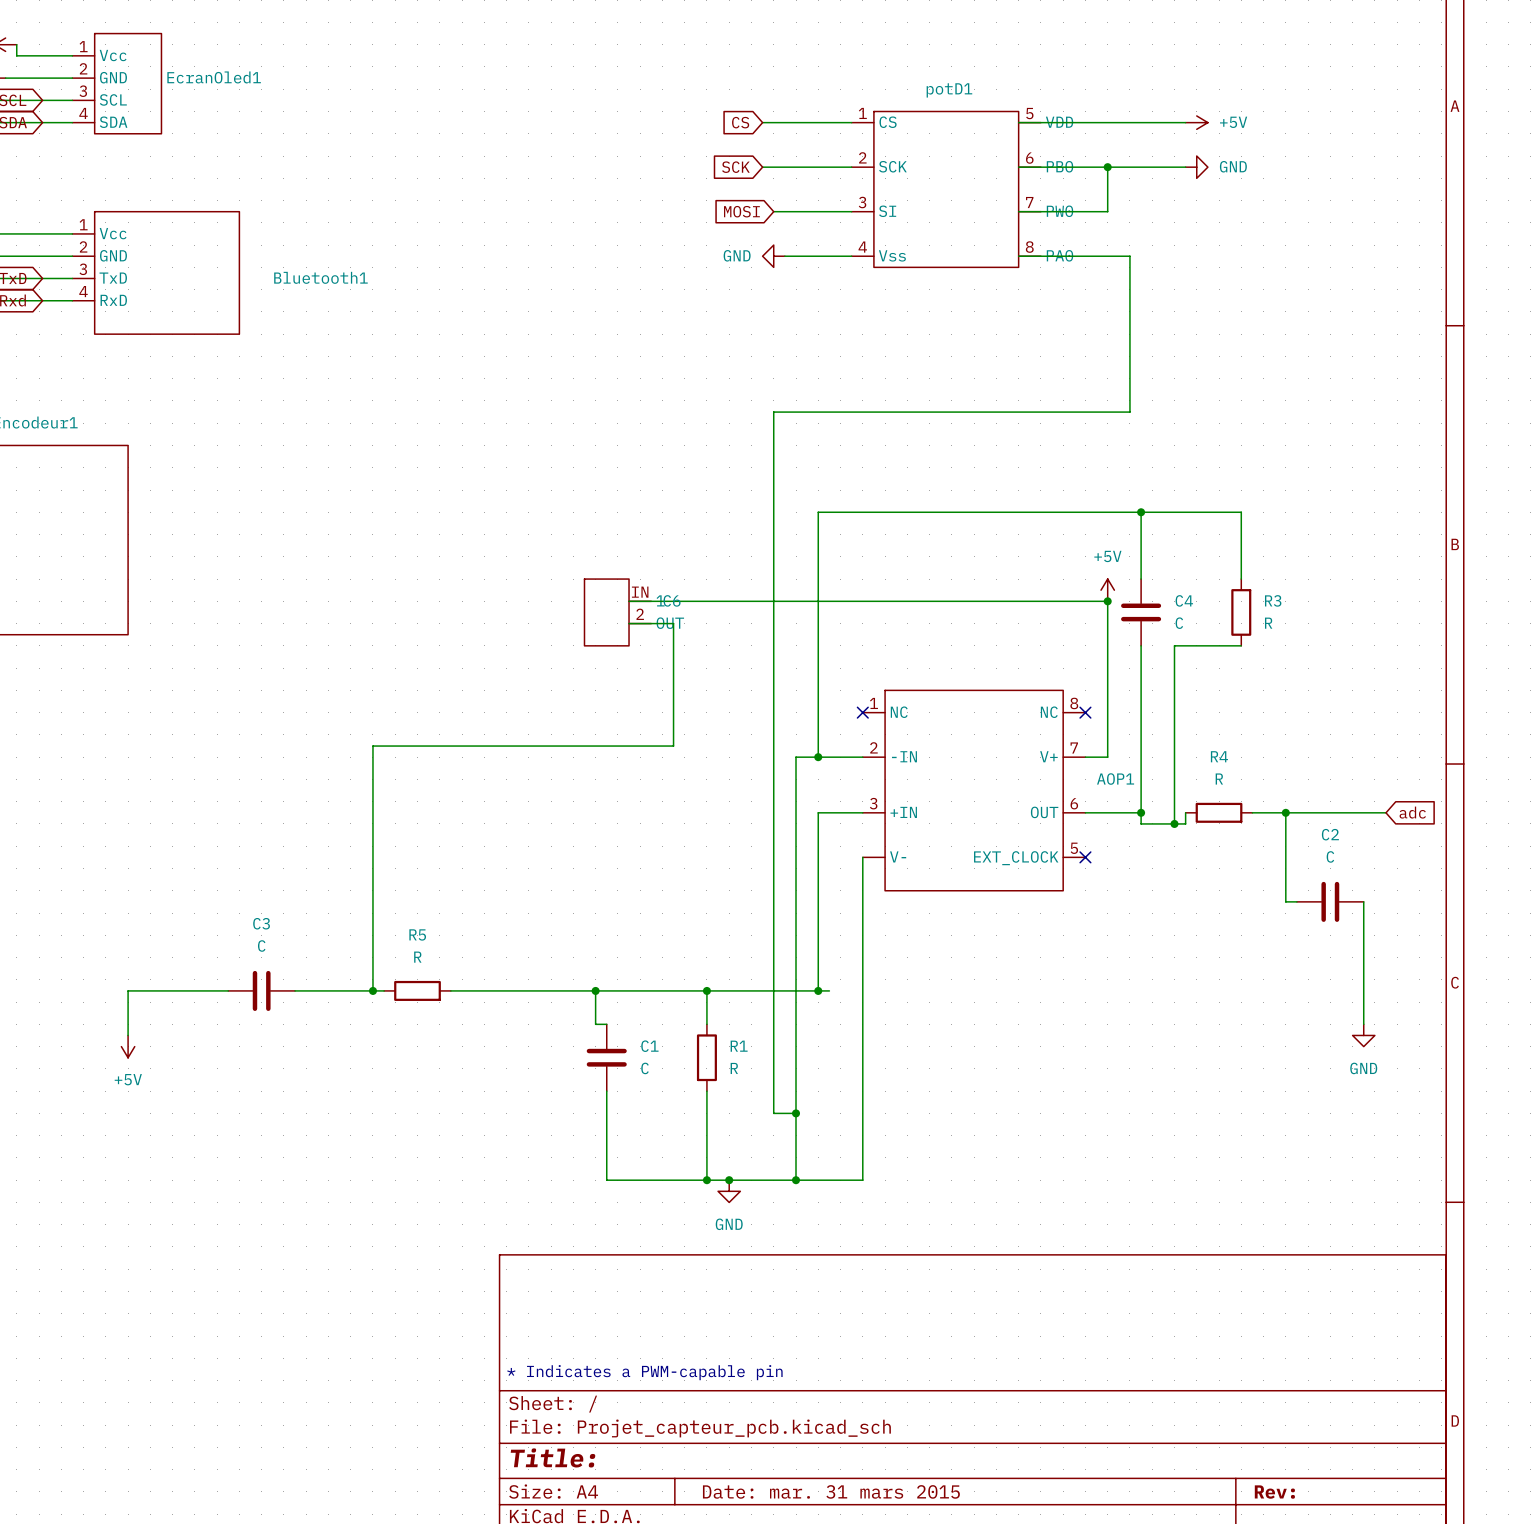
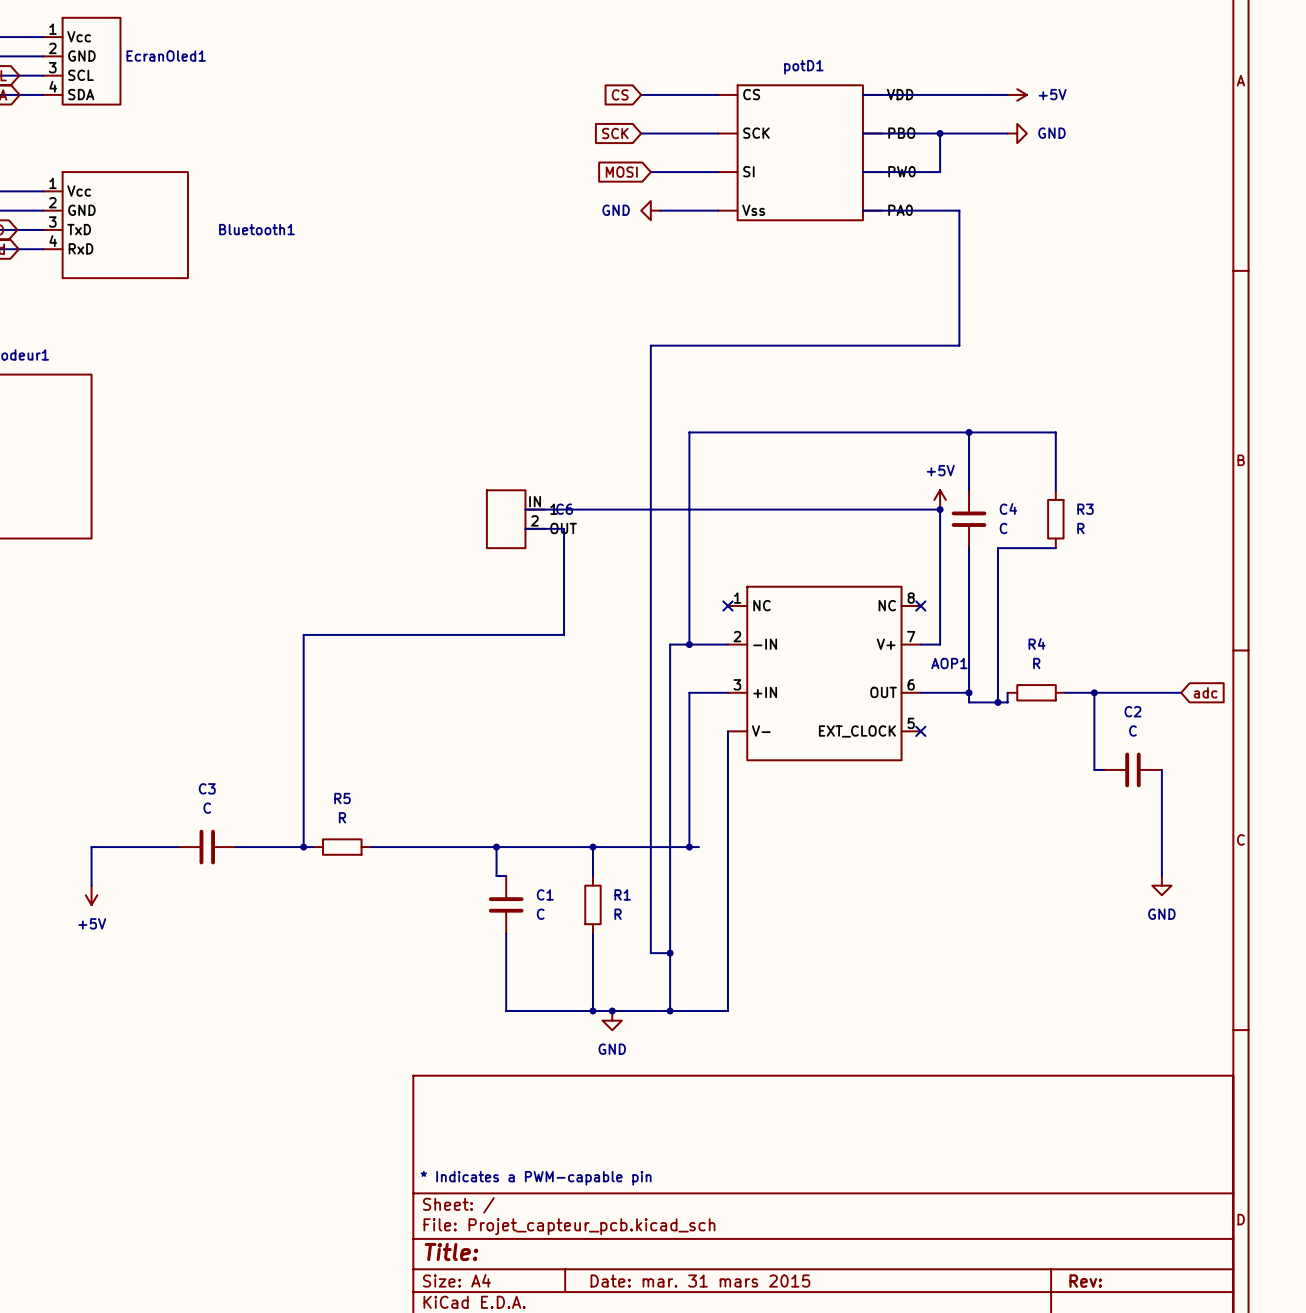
potD1 pin number: 1 (862, 113) -> none
potD1 pin number: 5 (1029, 113) -> none
potD1 pin number: 2 (862, 157) -> none
potD1 pin number: 6 (1029, 158) -> none
potD1 pin number: 3 (862, 202) -> none
potD1 pin number: 7 (1029, 202) -> none
potD1 pin number: 4 (862, 247) -> none
potD1 pin number: 8 (1029, 247) -> none

